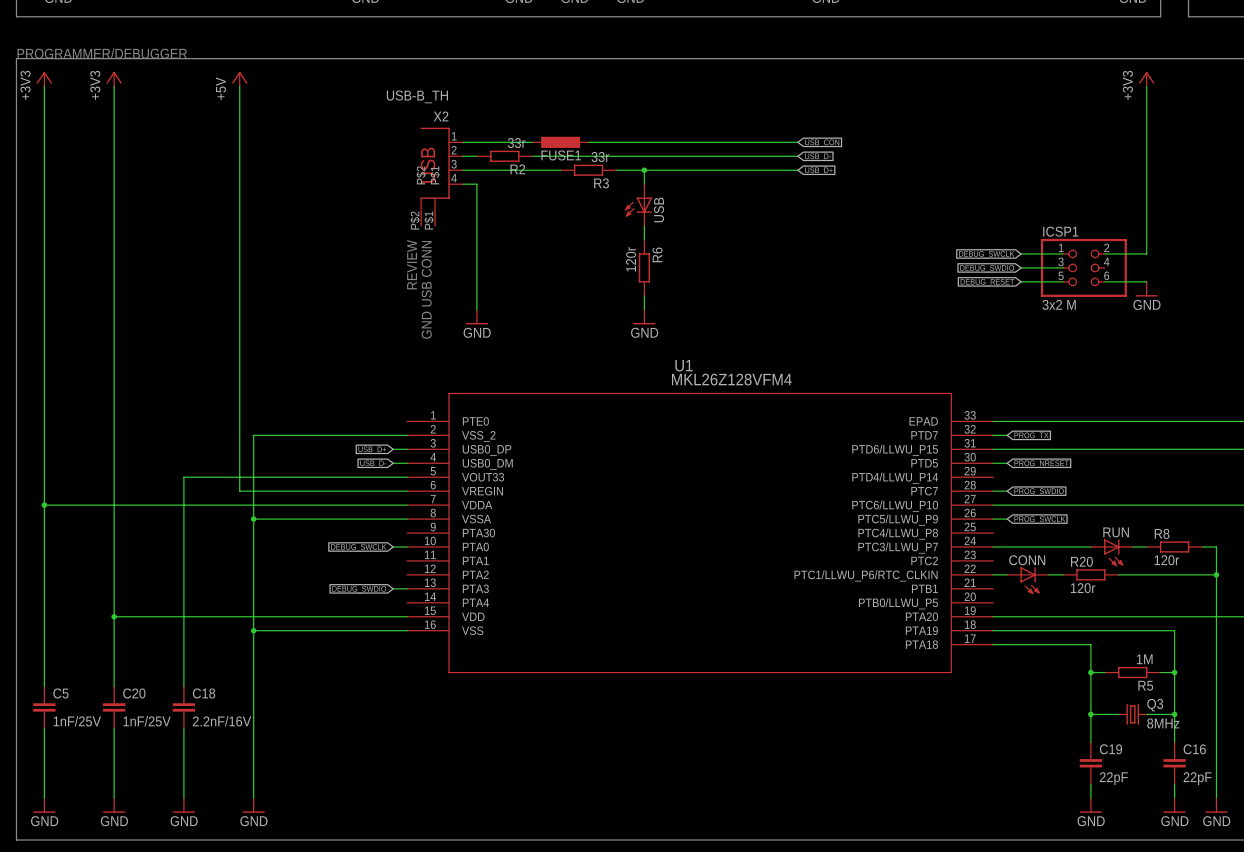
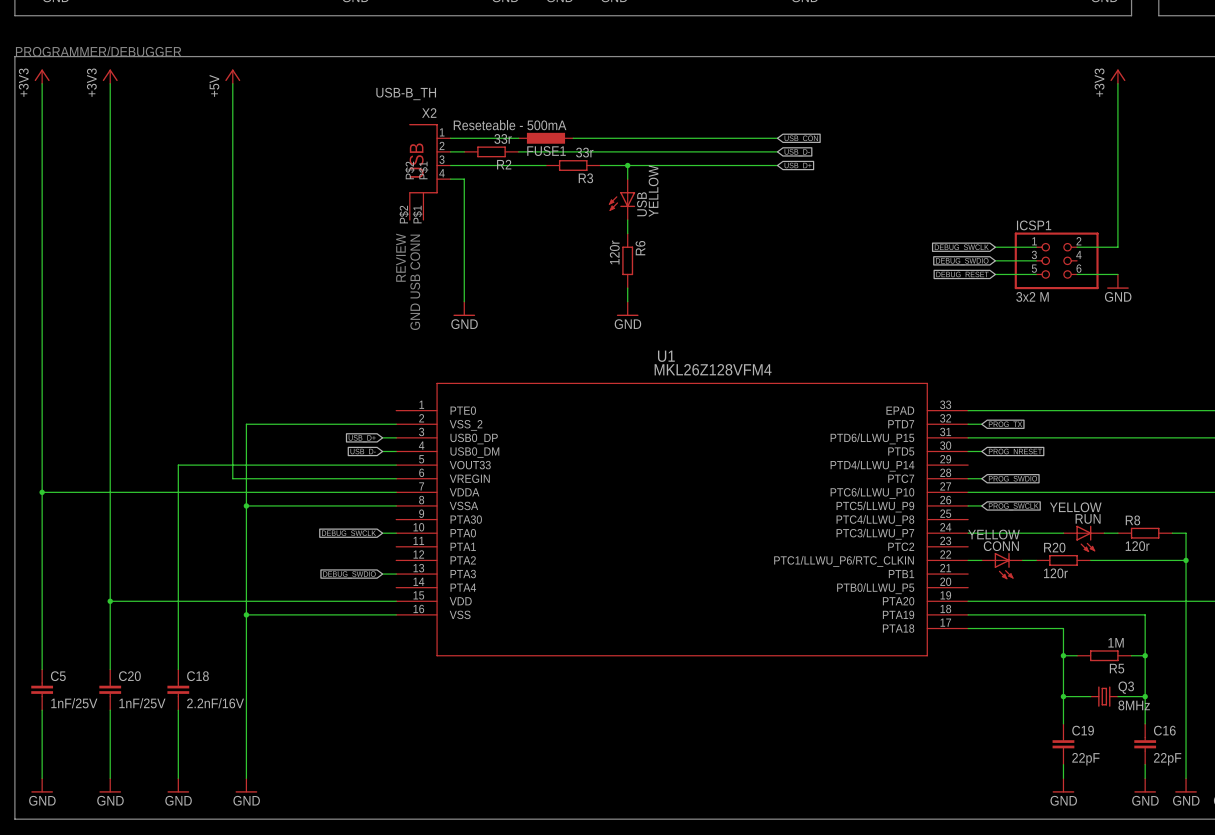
FUSE1 value: none -> Reseteable - 500mA (510, 125)
USB value: none -> YELLOW (653, 191)
RUN value: none -> YELLOW (1075, 507)
CONN value: none -> YELLOW (994, 534)

